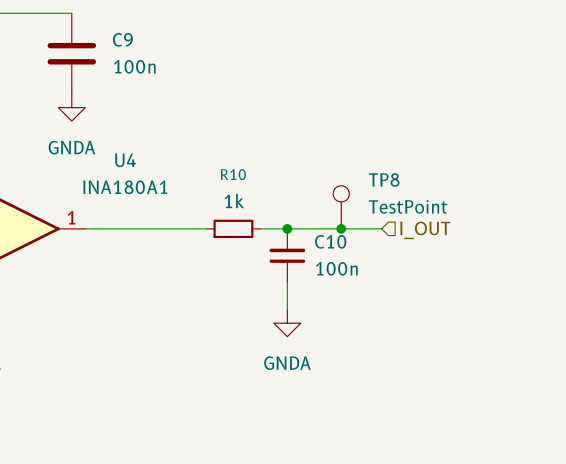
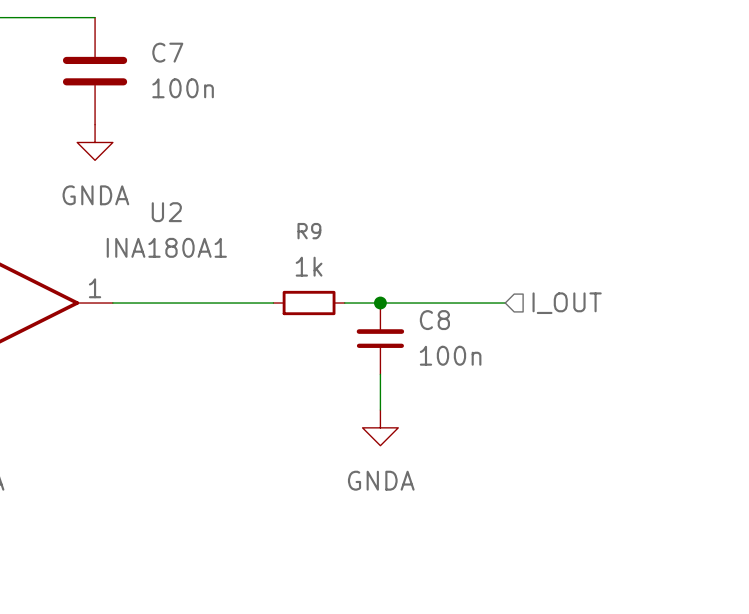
C9 name: C9 (122, 39) -> C7 (167, 52)
U4 name: U4 (125, 160) -> U2 (166, 212)
R10 name: R10 (233, 174) -> R9 (309, 231)
TP8: TestPoint (341, 207) -> none
junction: (341, 228) -> none
C10 name: C10 (330, 241) -> C8 (434, 320)

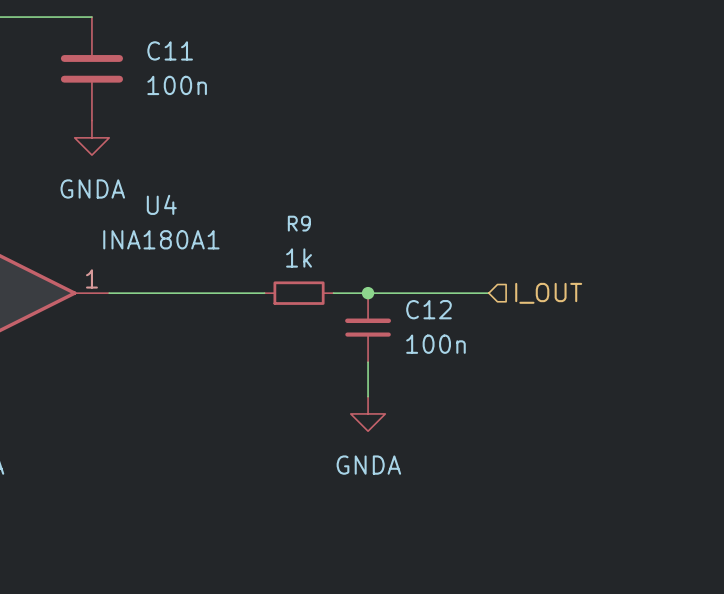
C7 name: C7 (167, 52) -> C11 (170, 50)
U2 name: U2 (166, 212) -> U4 (161, 204)
C8 name: C8 (434, 320) -> C12 (428, 309)

